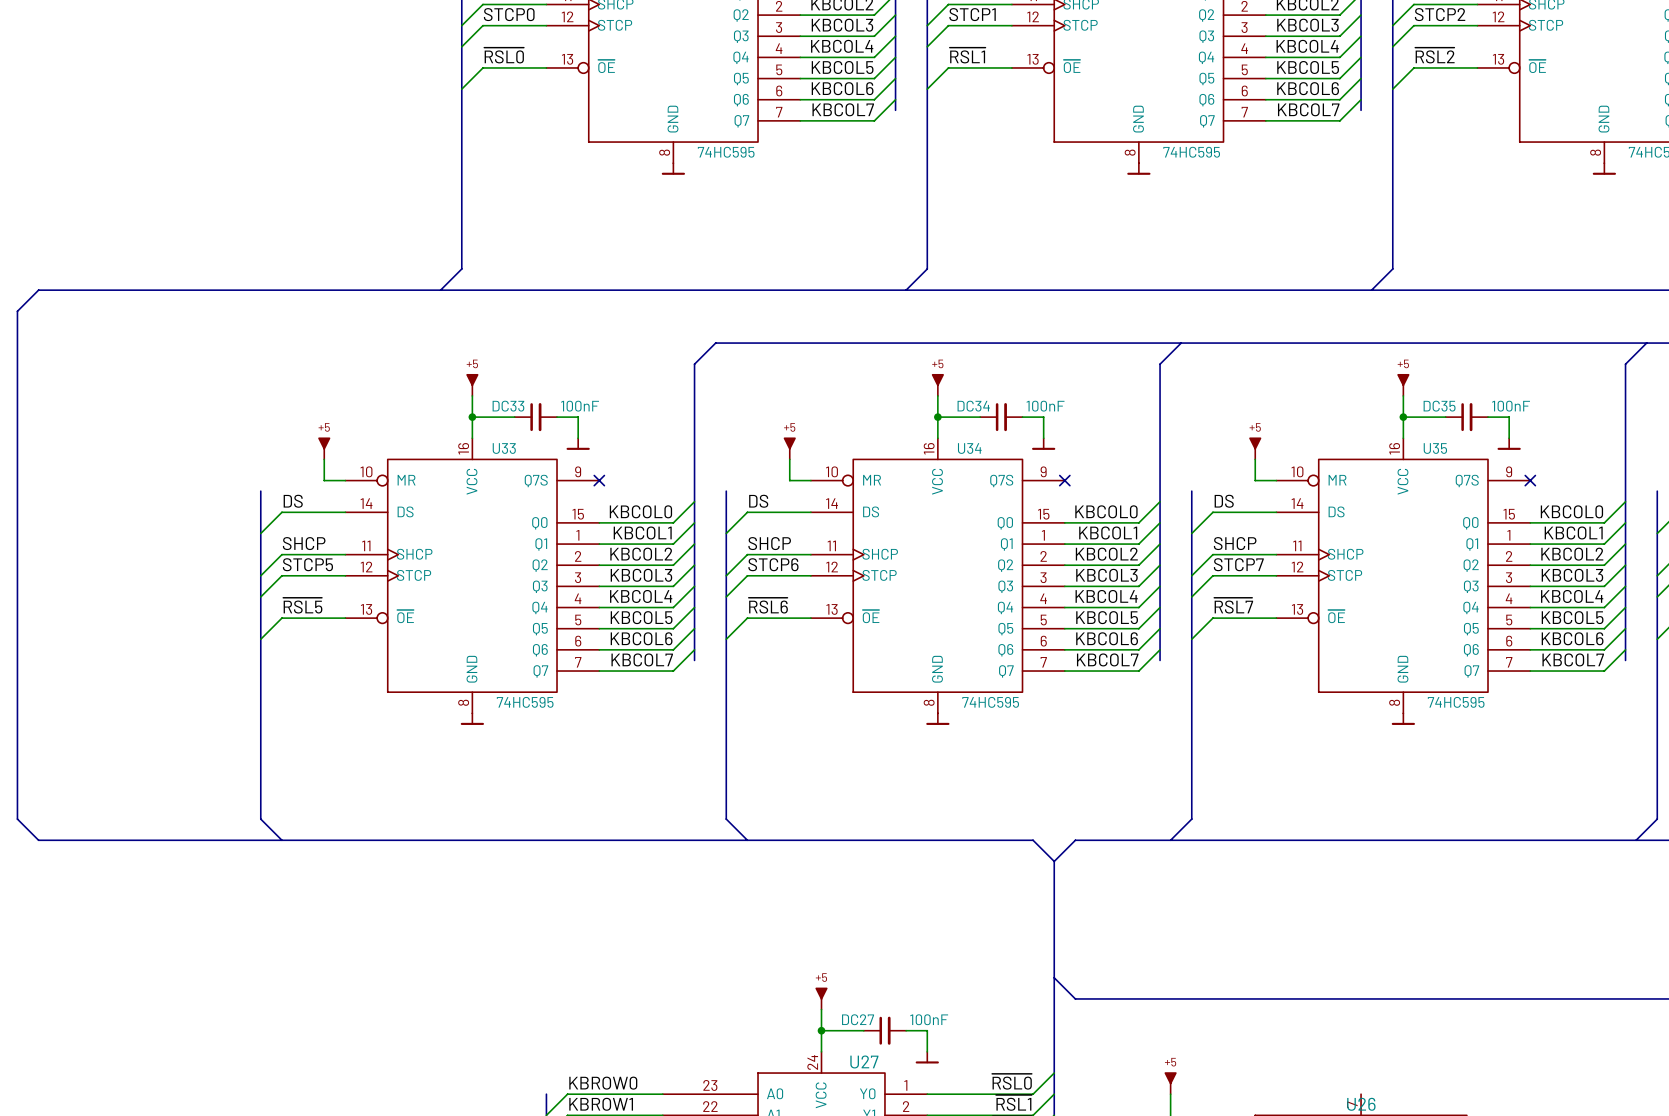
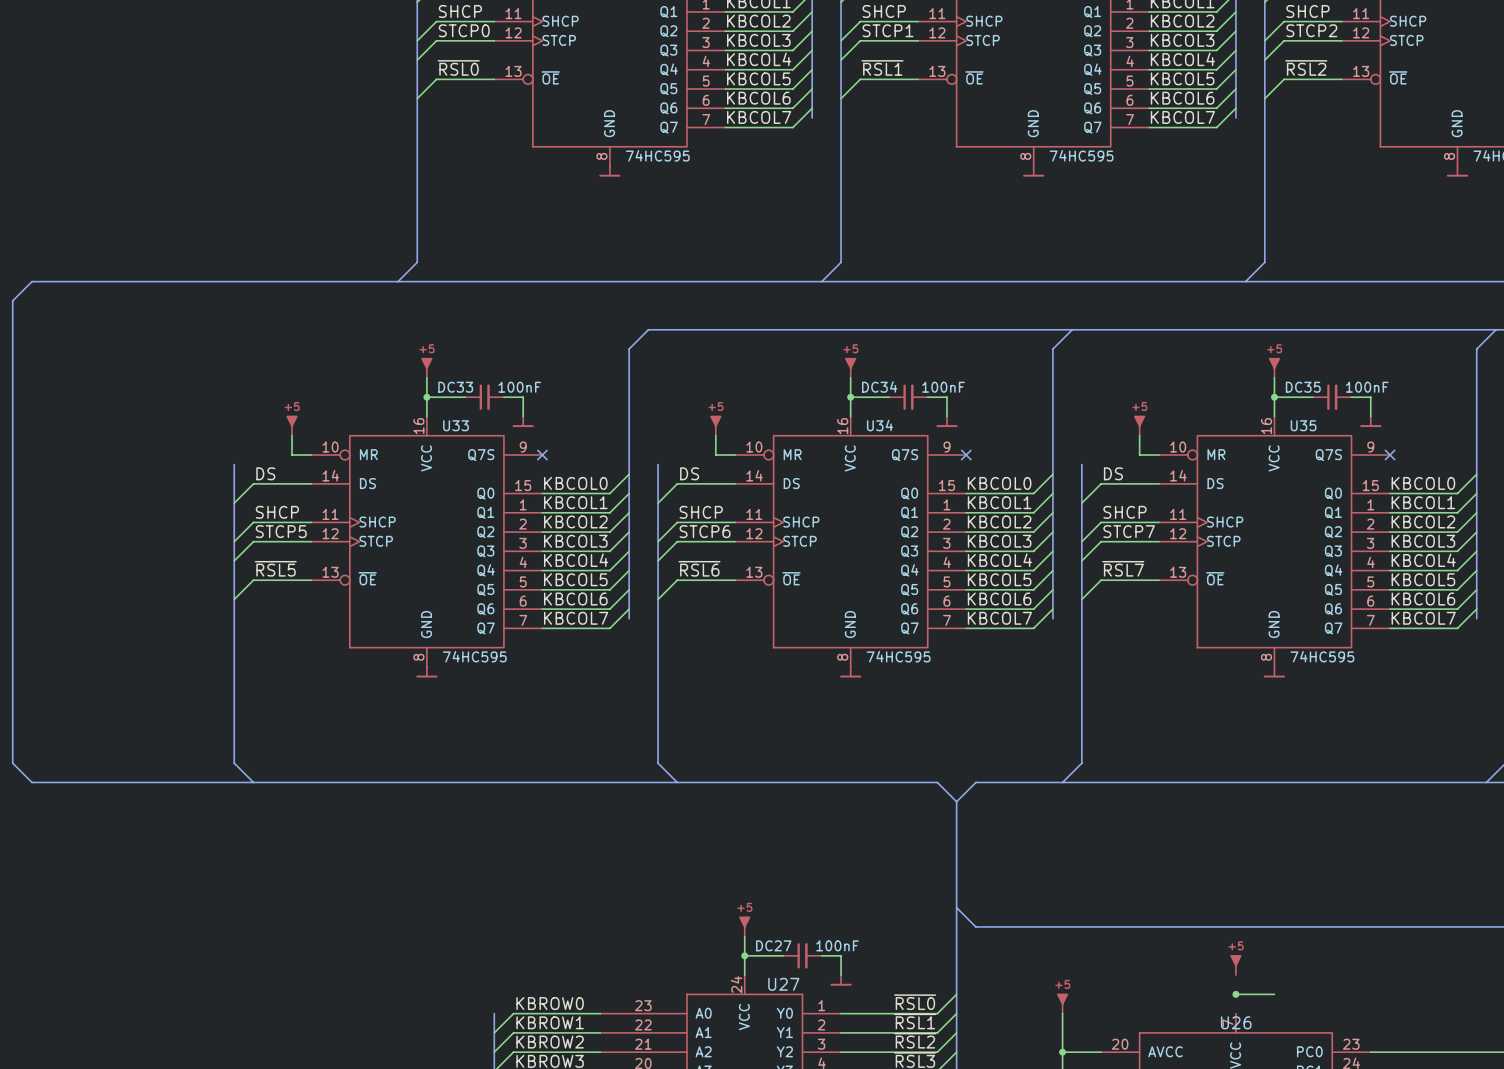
power symbol: none -> (1235, 965)
wire: none -> (1235, 994) (1274, 994)
junction: none -> (1235, 994)

